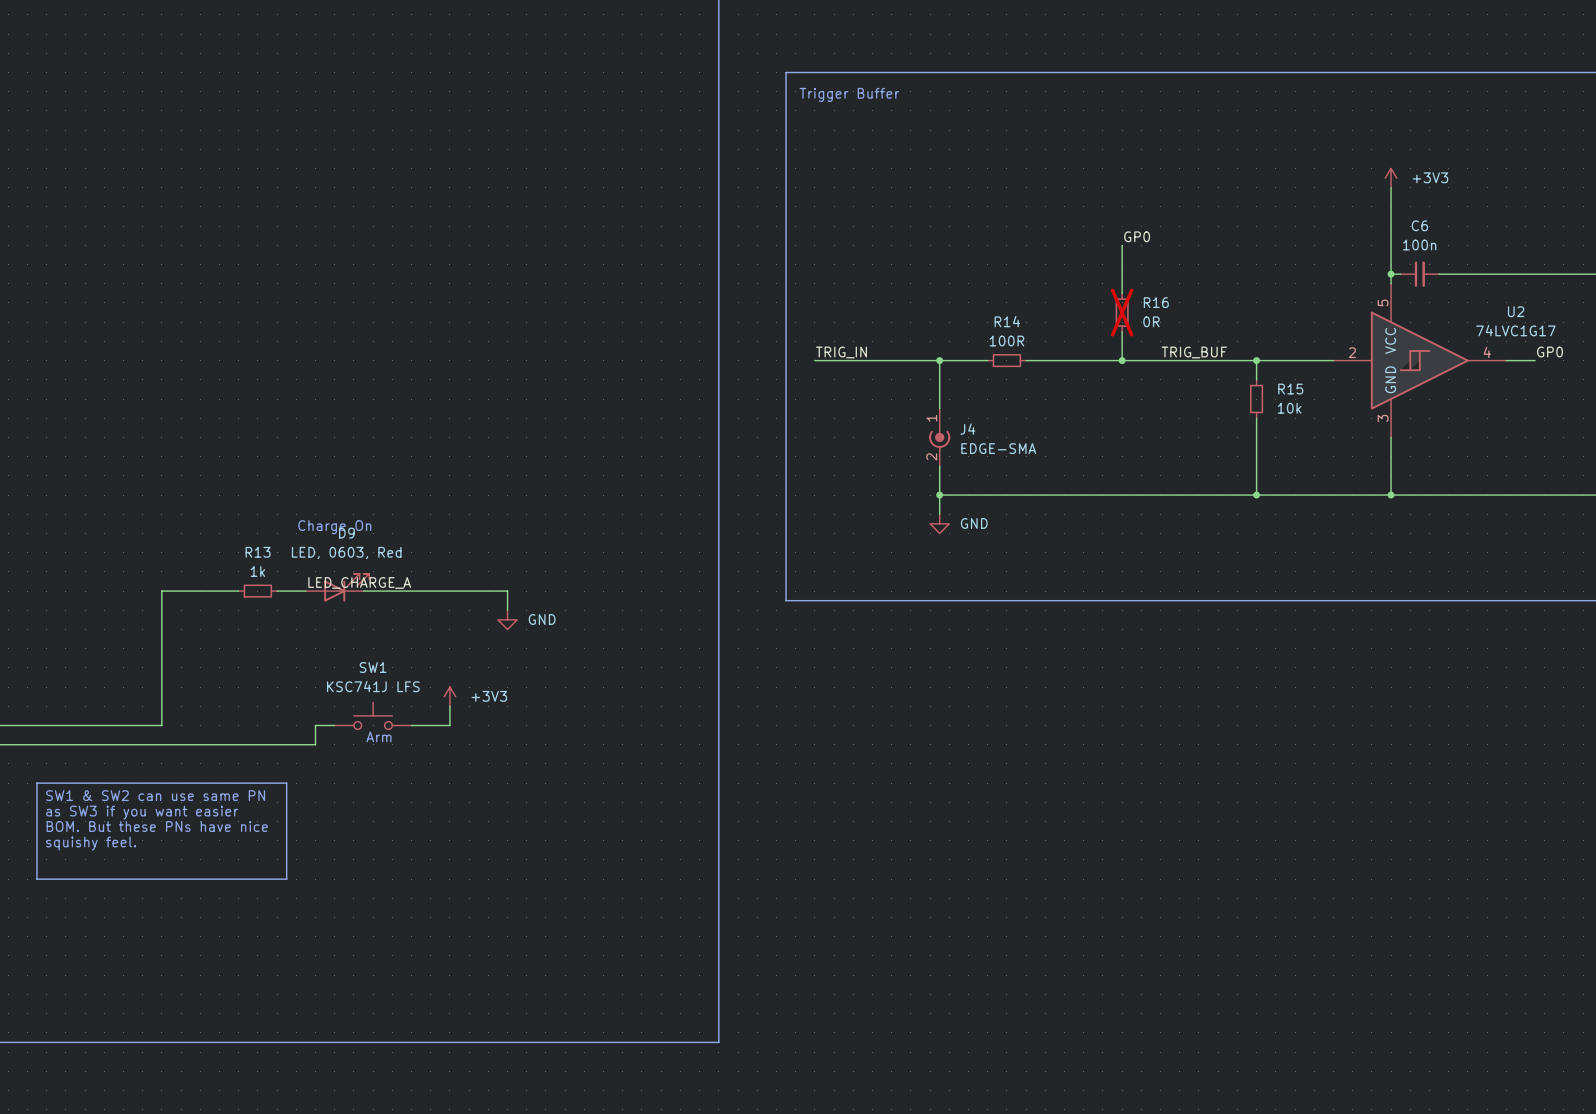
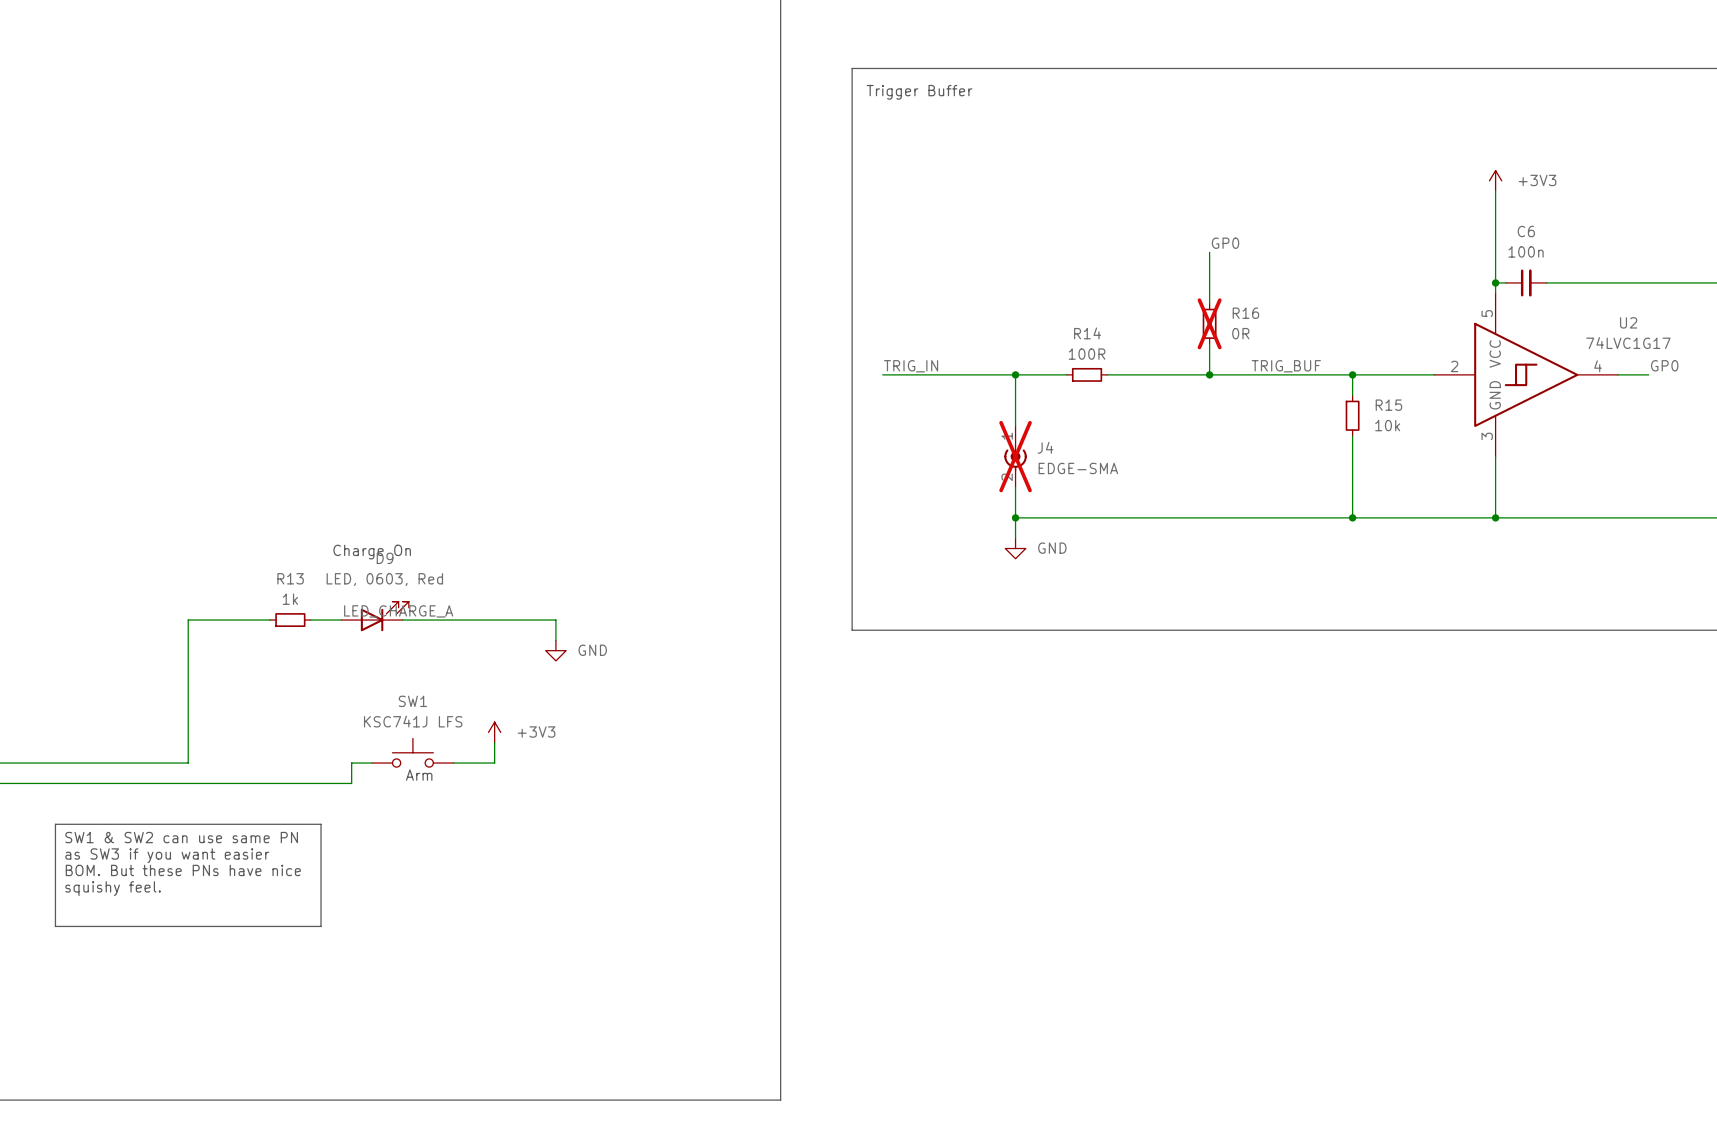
J4 do-not-place cross: none -> (1015, 456)

